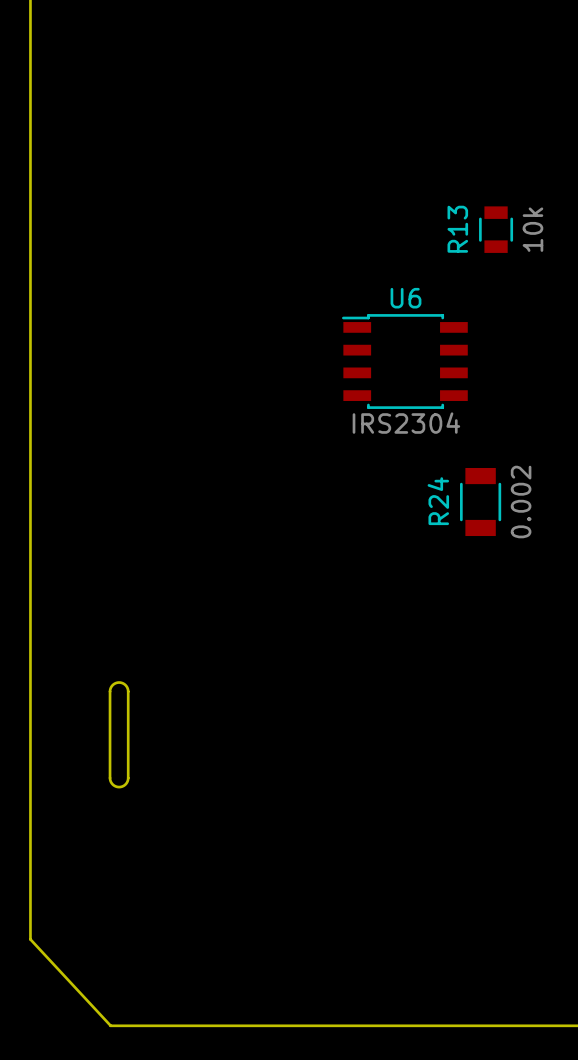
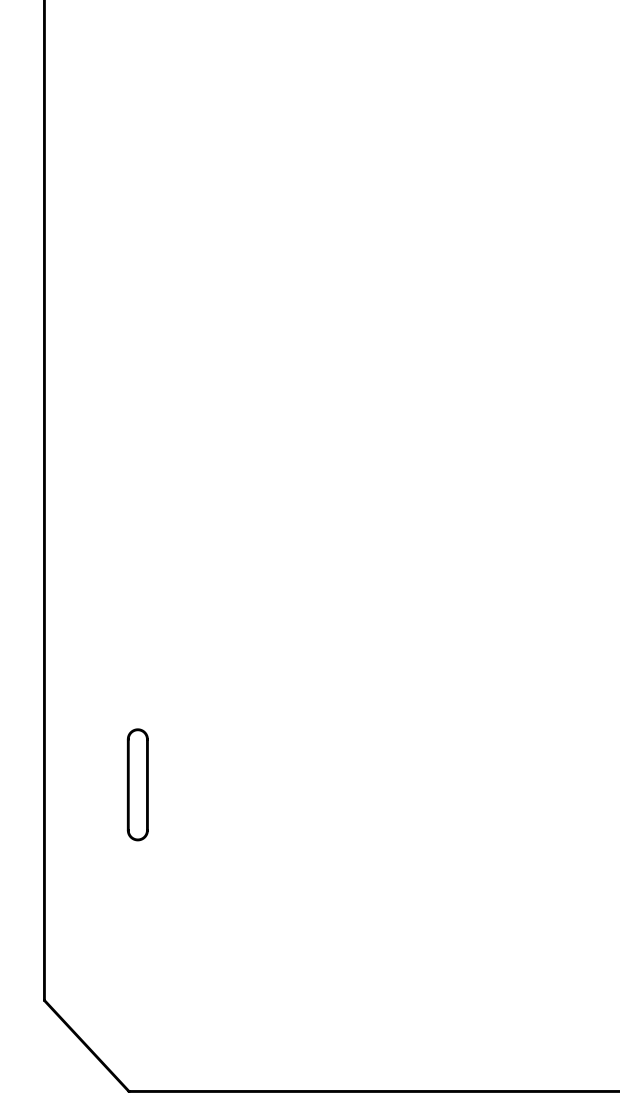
R13: 10k (496, 229) -> none
U6: IRS2304 (404, 361) -> none
R24: 0.002 (480, 502) -> none

